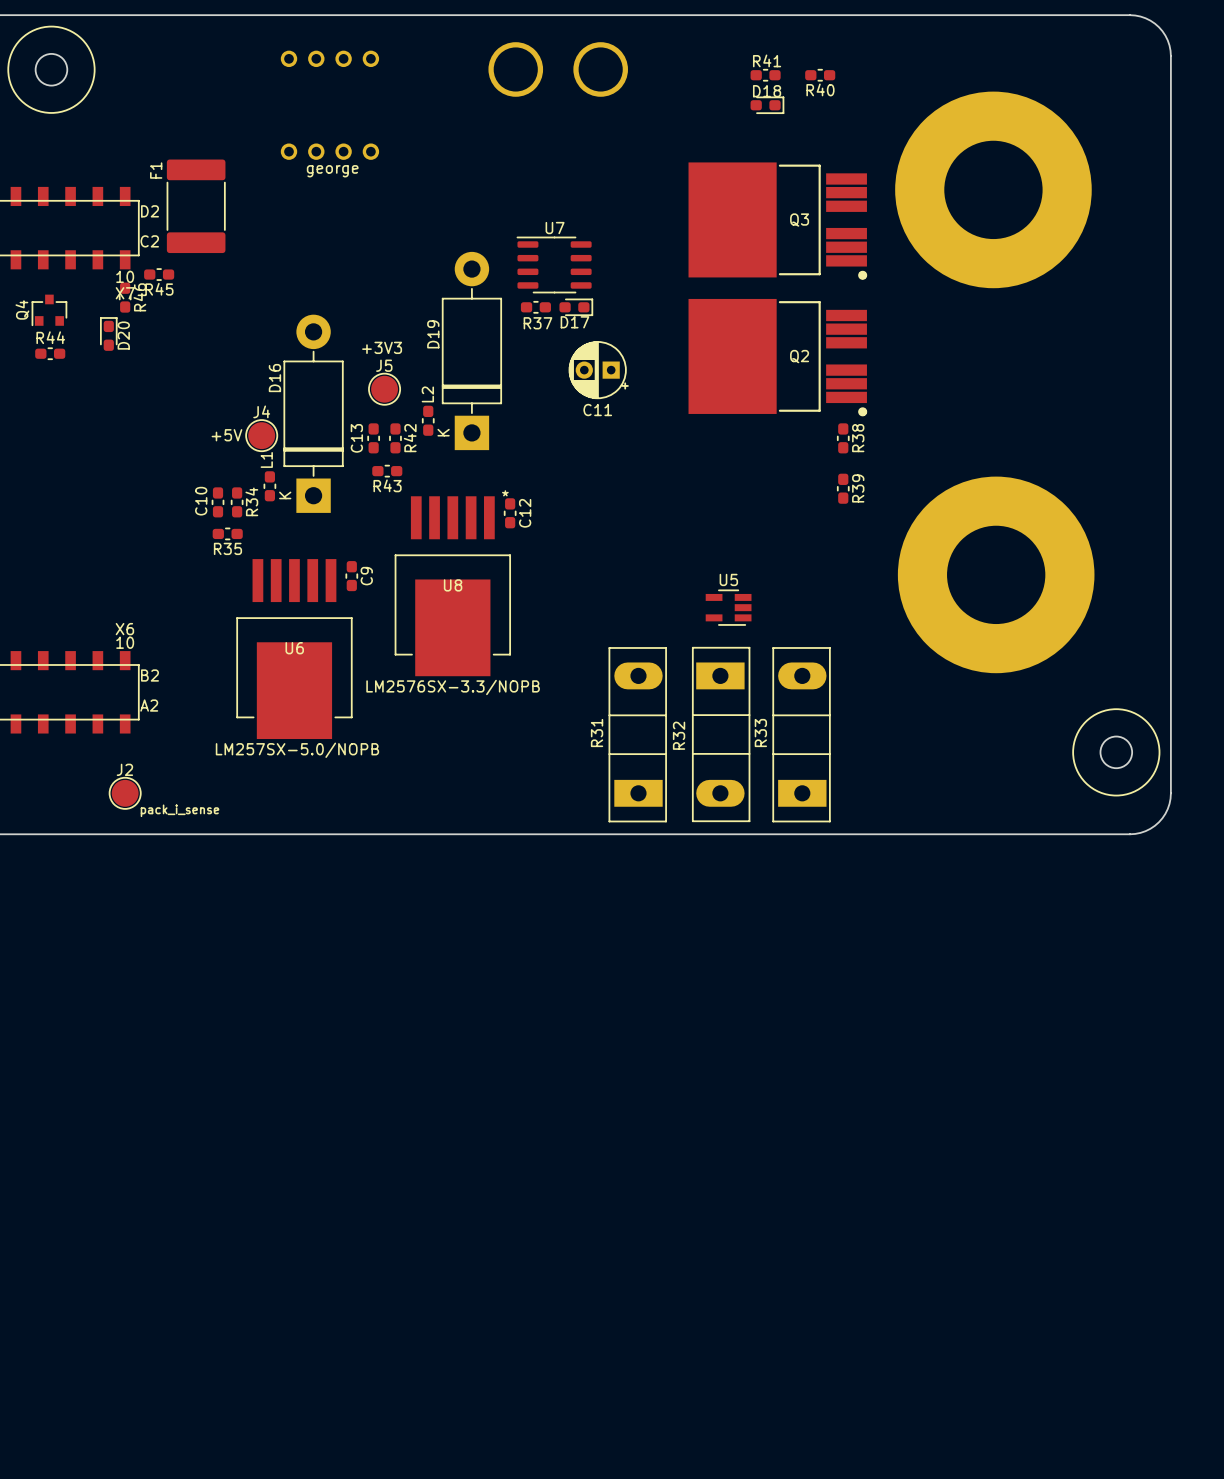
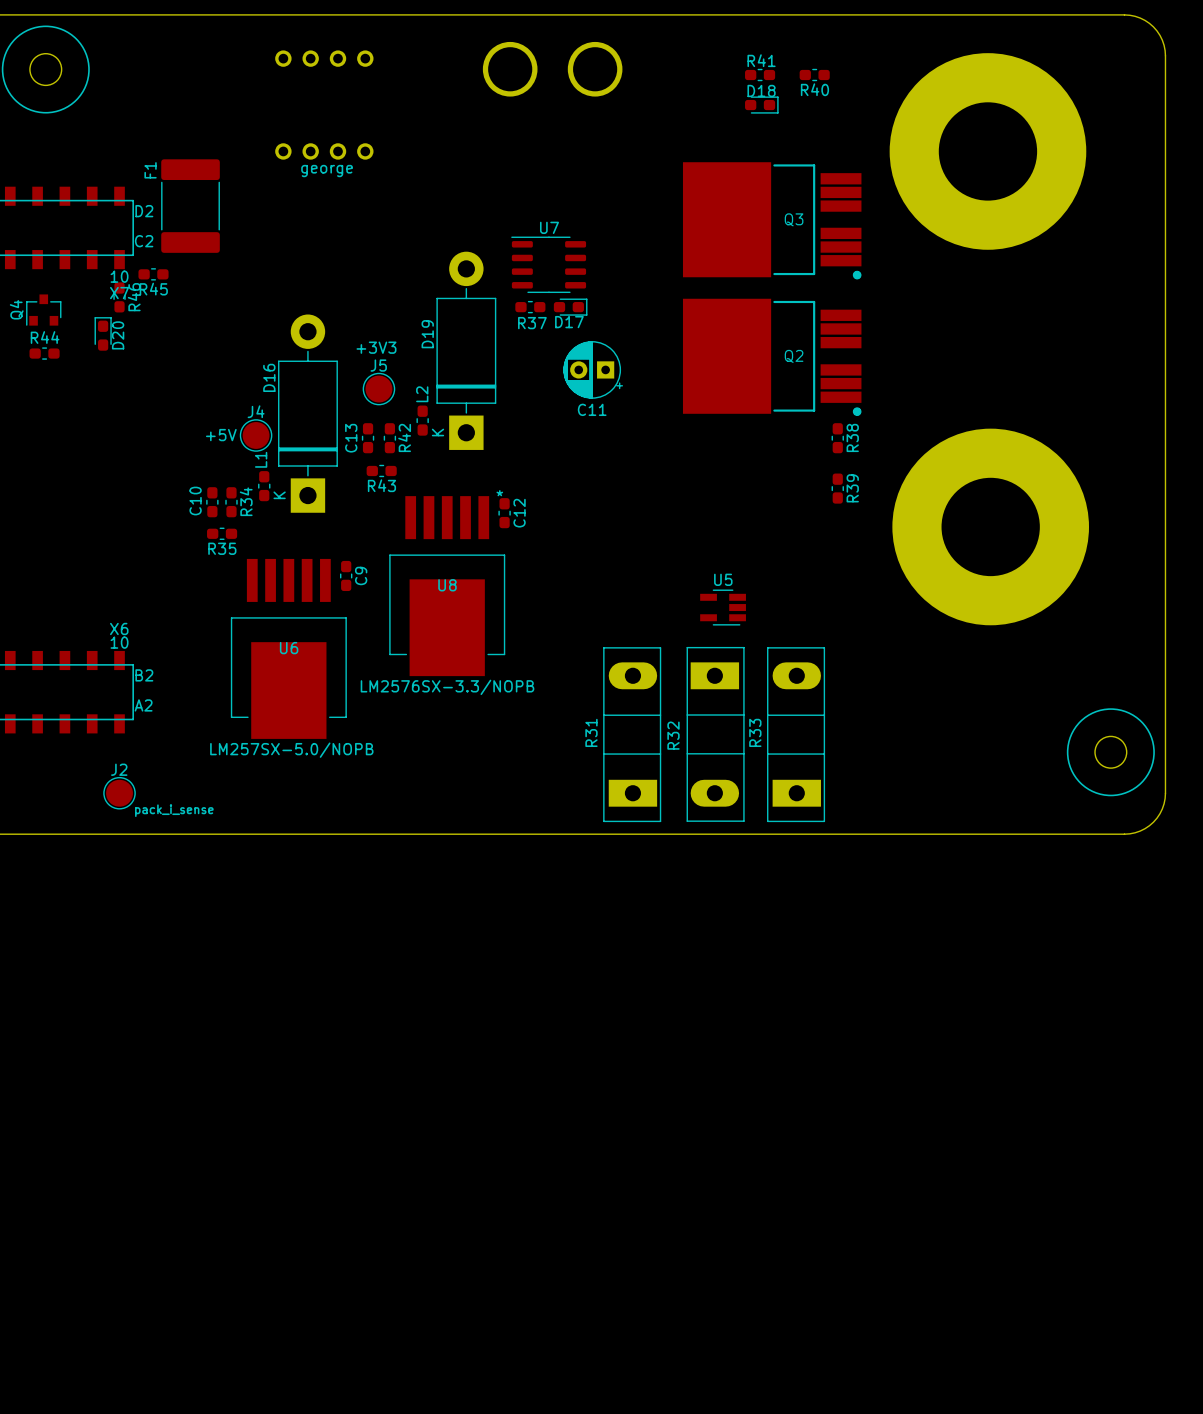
part position: (993, 189) -> (987, 151)
part position: (996, 574) -> (990, 526)

